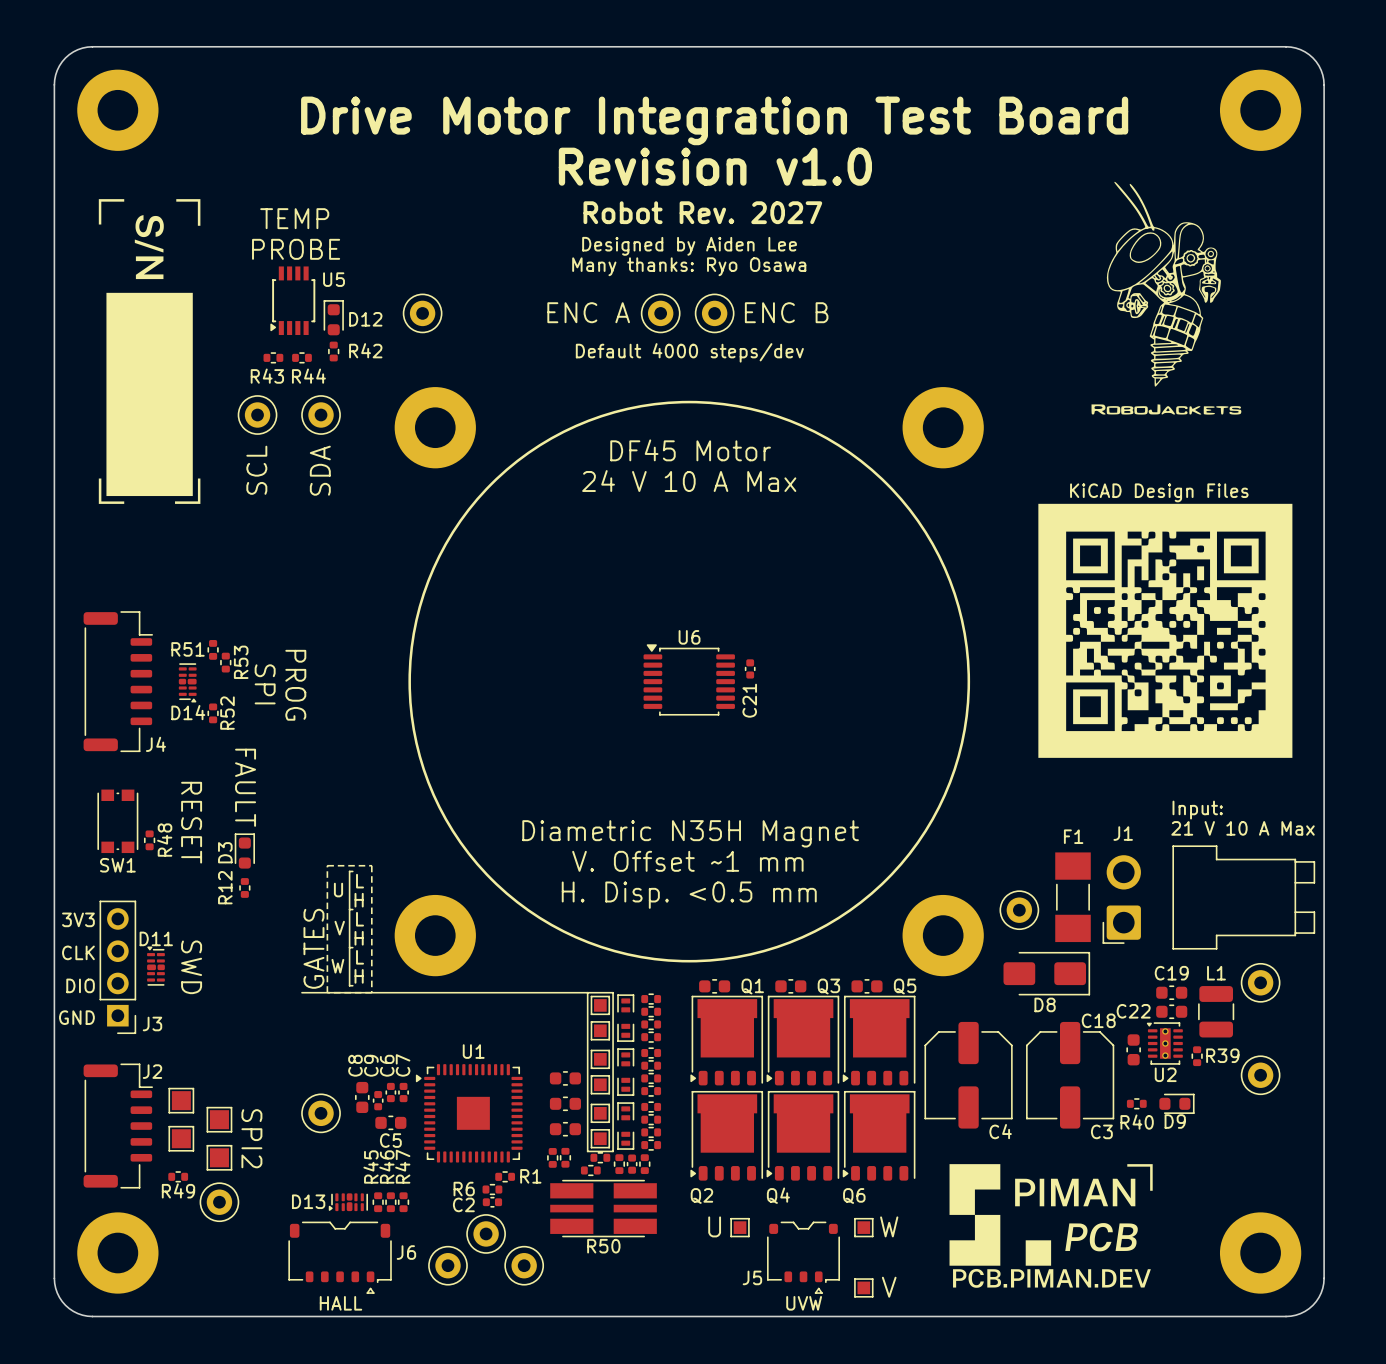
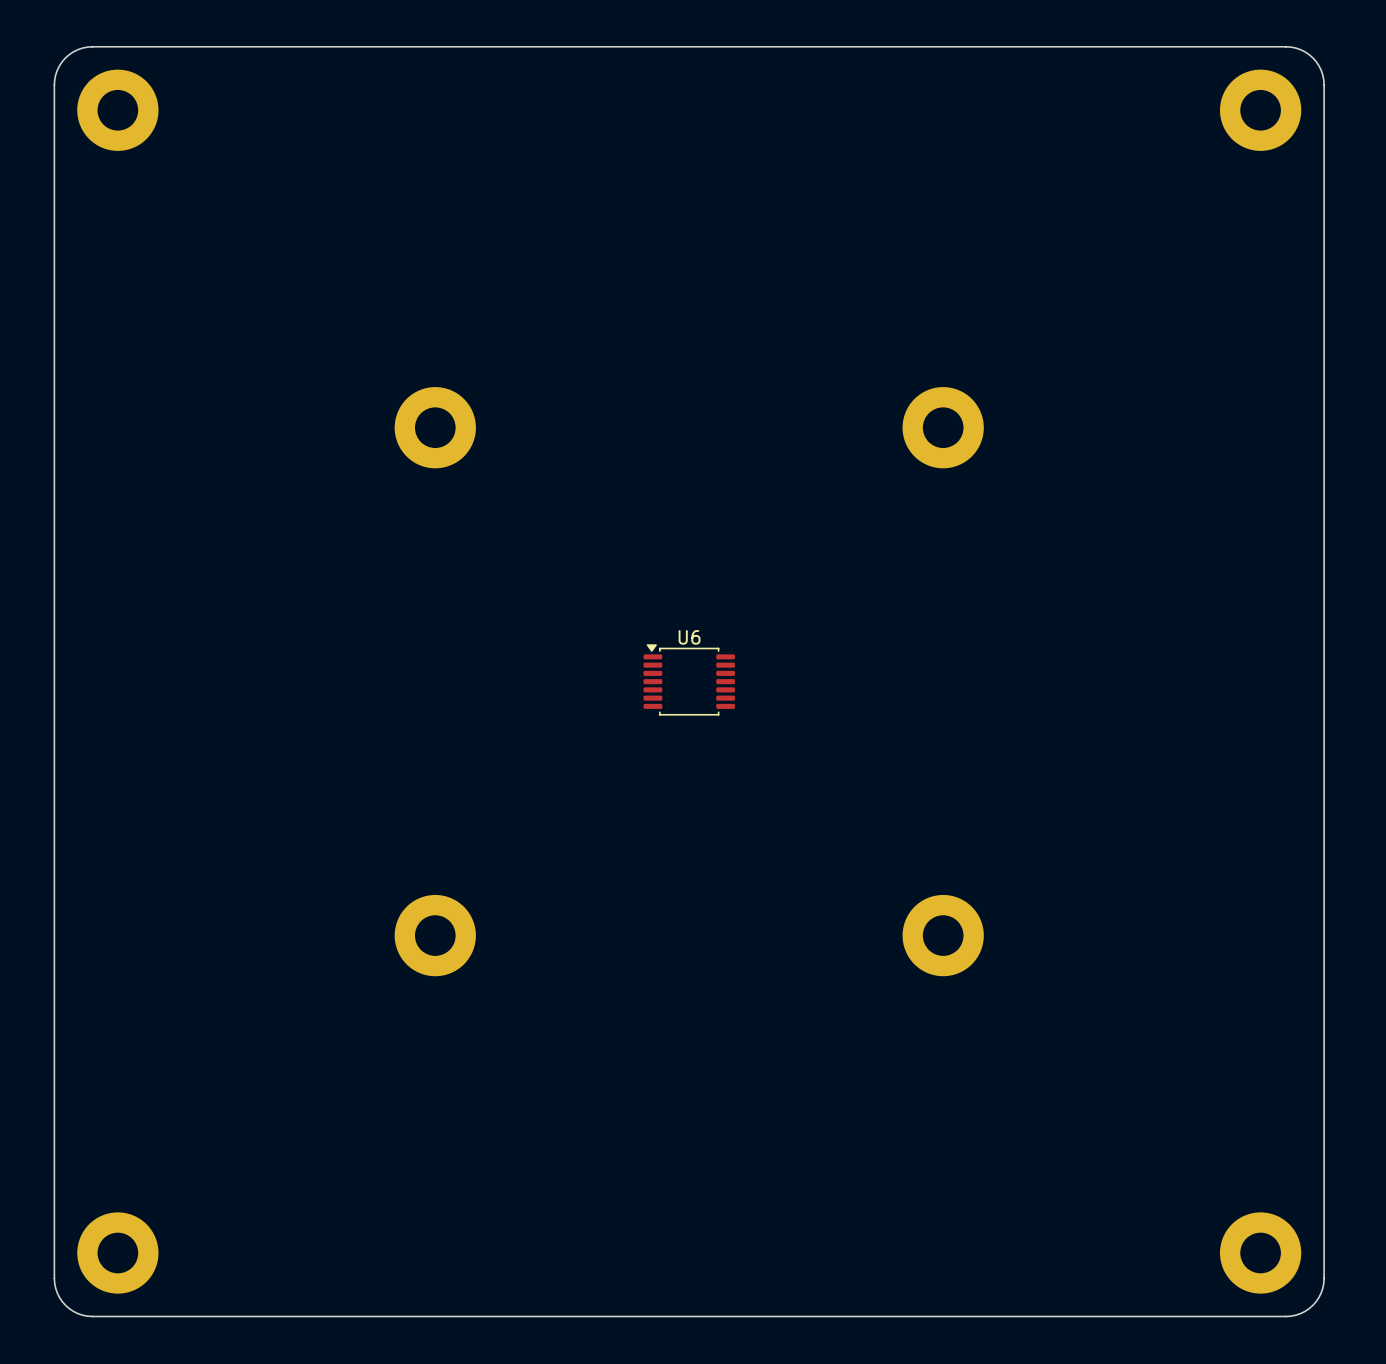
text: Drive Motor Integration Test Board (714, 120) -> none
text: Revision v1.0 (715, 166) -> none
drawing: [1091, 181, 1242, 415] -> none
drawing: [98, 199, 201, 504] -> none
text: Robot Rev. 2027 (702, 212) -> none
text: TEMP (294, 218) -> none
text: Designed by Aiden Lee (689, 246) -> none
text: PROBE (296, 249) -> none
text: Many thanks: Ryo Osawa (689, 266) -> none
U5: (292, 300) -> none
text: ENC A (588, 312) -> none
text: ENC B (786, 312) -> none
part: (422, 313) -> none
part: (660, 313) -> none
part: (714, 313) -> none
D12: (333, 317) -> none
R42: (333, 351) -> none
text: Default 4000 steps/dev (689, 352) -> none
R43: (273, 357) -> none
R44: (301, 357) -> none
drawing: [408, 400, 971, 963] -> none
part: (257, 415) -> none
part: (321, 415) -> none
text: DF45 Motor (690, 450) -> none
text: SCL (256, 470) -> none
text: SDA (320, 470) -> none
text: 24 V 10 A Max (689, 481) -> none
text: KiCAD Design Files (1159, 492) -> none
drawing: [1038, 503, 1293, 758] -> none
R51: (213, 649) -> none
R53: (225, 662) -> none
C21: (750, 668) -> none
J4: (118, 681) -> none
D14: (187, 682) -> none
text: SPI (265, 684) -> none
text: PROG (295, 685) -> none
R52: (213, 713) -> none
text: FAULT (245, 787) -> none
text: Input: (1197, 810) -> none
SW1: (117, 821) -> none
text: RESET (191, 822) -> none
text: 21 V 10 A Max (1243, 828) -> none
text: Diametric N35H Magnet (690, 833) -> none
R48: (149, 840) -> none
D3: (244, 851) -> none
text: V. Offset ~1 mm (687, 861) -> none
line: (327, 865) (371, 865) (371, 992) (327, 992) (327, 865) -> none
line: (352, 871) (349, 871) (349, 985) (352, 985) -> none
text: L (360, 881) -> none
R12: (244, 887) -> none
text: U (338, 890) -> none
text: H. Disp. <0.5 mm (689, 895) -> none
F1: (1073, 897) -> none
J1: (1208, 897) -> none
text: H (359, 900) -> none
line: (349, 909) (352, 909) -> none
part: (1019, 910) -> none
text: 3V3 (78, 919) -> none
text: L (360, 919) -> none
text: V (339, 928) -> none
text: H (359, 938) -> none
line: (349, 947) (352, 947) -> none
text: GATES (313, 948) -> none
text: CLK (78, 952) -> none
text: L (360, 957) -> none
D11: (155, 966) -> none
text: W (337, 966) -> none
J3: (117, 967) -> none
text: SWD (191, 967) -> none
D8: (1046, 973) -> none
text: H (359, 976) -> none
part: (1260, 982) -> none
text: DIO (80, 985) -> none
part: (714, 986) -> none
part: (790, 986) -> none
part: (867, 986) -> none
line: (301, 992) (613, 992) (613, 1151) (587, 1151) (587, 992) -> none
C19: (1171, 992) -> none
part: (651, 999) -> none
part: (625, 1003) -> none
part: (600, 1005) -> none
part: (651, 1011) -> none
C22: (1171, 1011) -> none
L1: (1216, 1011) -> none
text: GND (76, 1017) -> none
part: (651, 1024) -> none
part: (600, 1030) -> none
part: (625, 1032) -> none
part: (651, 1037) -> none
Q1: (726, 1040) -> none
Q3: (802, 1040) -> none
Q5: (879, 1040) -> none
U2: (1164, 1043) -> none
C18: (1133, 1049) -> none
part: (651, 1053) -> none
R39: (1197, 1056) -> none
part: (625, 1057) -> none
part: (600, 1059) -> none
part: (651, 1065) -> none
C4: (968, 1075) -> none
C3: (1070, 1075) -> none
part: (1260, 1075) -> none
part: (565, 1078) -> none
part: (651, 1078) -> none
part: (600, 1084) -> none
part: (625, 1086) -> none
part: (651, 1091) -> none
C6: (390, 1092) -> none
C7: (403, 1092) -> none
C8: (362, 1097) -> none
part: (181, 1100) -> none
C9: (378, 1100) -> none
part: (565, 1103) -> none
R40: (1136, 1103) -> none
D9: (1176, 1103) -> none
part: (651, 1106) -> none
part: (625, 1111) -> none
part: (321, 1113) -> none
U1: (469, 1113) -> none
part: (600, 1113) -> none
part: (219, 1119) -> none
part: (651, 1119) -> none
C5: (390, 1122) -> none
J2: (118, 1126) -> none
part: (565, 1129) -> none
part: (651, 1132) -> none
Q2: (726, 1135) -> none
Q4: (802, 1135) -> none
Q6: (879, 1135) -> none
part: (181, 1138) -> none
text: SPI2 (251, 1138) -> none
part: (600, 1138) -> none
part: (625, 1140) -> none
part: (651, 1145) -> none
part: (219, 1157) -> none
part: (552, 1157) -> none
part: (565, 1157) -> none
part: (600, 1157) -> none
part: (619, 1164) -> none
part: (632, 1164) -> none
part: (644, 1164) -> none
drawing: [949, 1164, 1153, 1288] -> none
part: (590, 1170) -> none
R49: (178, 1176) -> none
R1: (505, 1176) -> none
R6: (492, 1189) -> none
part: (219, 1202) -> none
D13: (348, 1202) -> none
R45: (378, 1202) -> none
R46: (390, 1202) -> none
R47: (403, 1202) -> none
C2: (492, 1202) -> none
R50: (603, 1208) -> none
text: U (714, 1226) -> none
text: W (889, 1226) -> none
part: (740, 1227) -> none
part: (863, 1227) -> none
part: (486, 1233) -> none
J6: (340, 1257) -> none
J5: (803, 1257) -> none
part: (447, 1265) -> none
part: (524, 1265) -> none
part: (863, 1287) -> none
text: V (889, 1287) -> none
text: HALL (340, 1303) -> none
text: UVW (804, 1303) -> none

